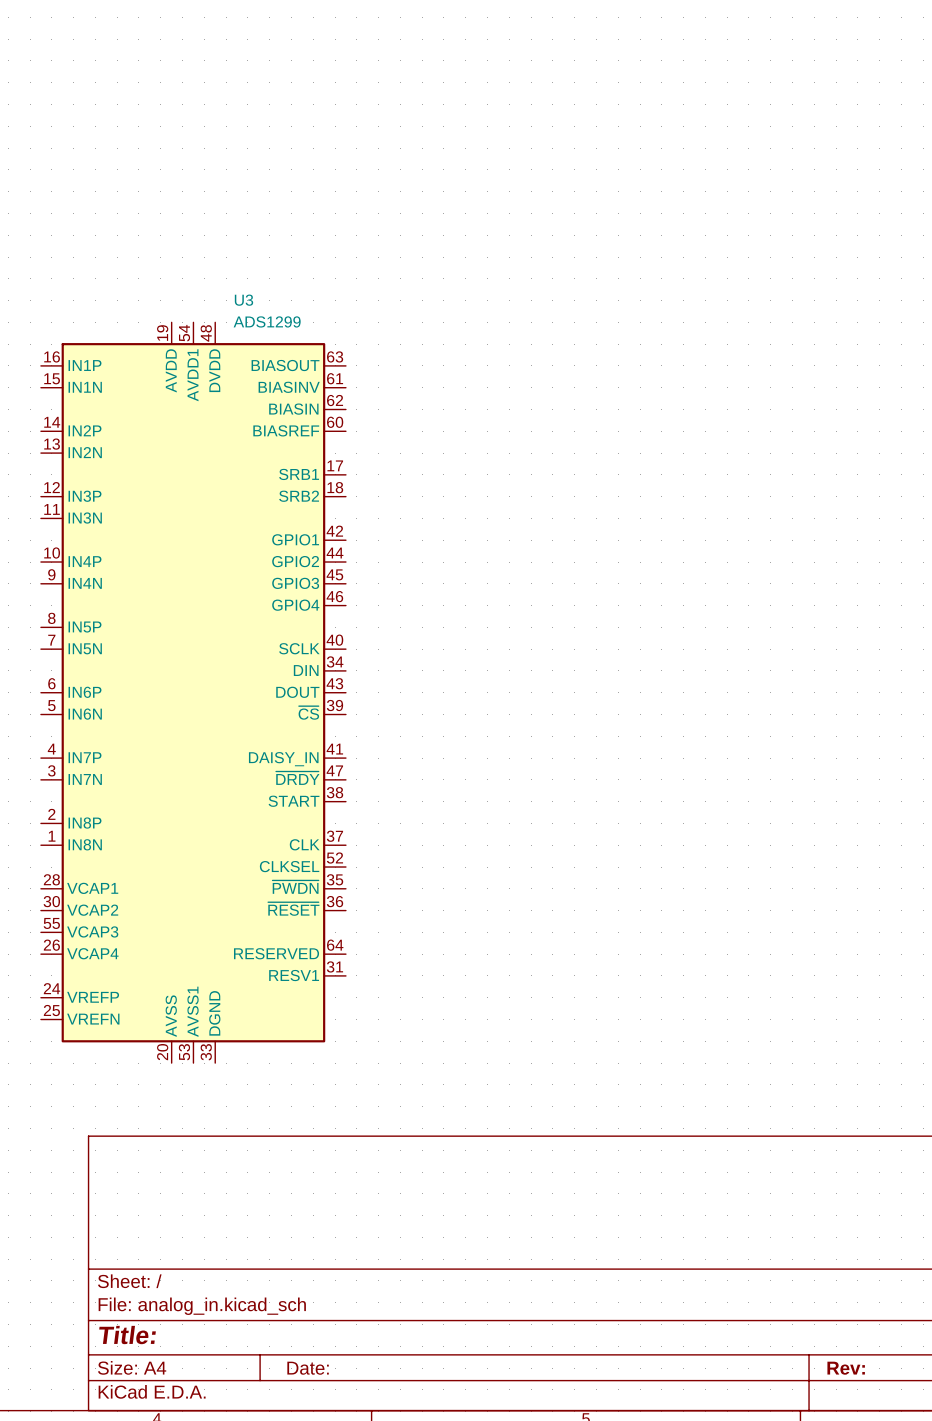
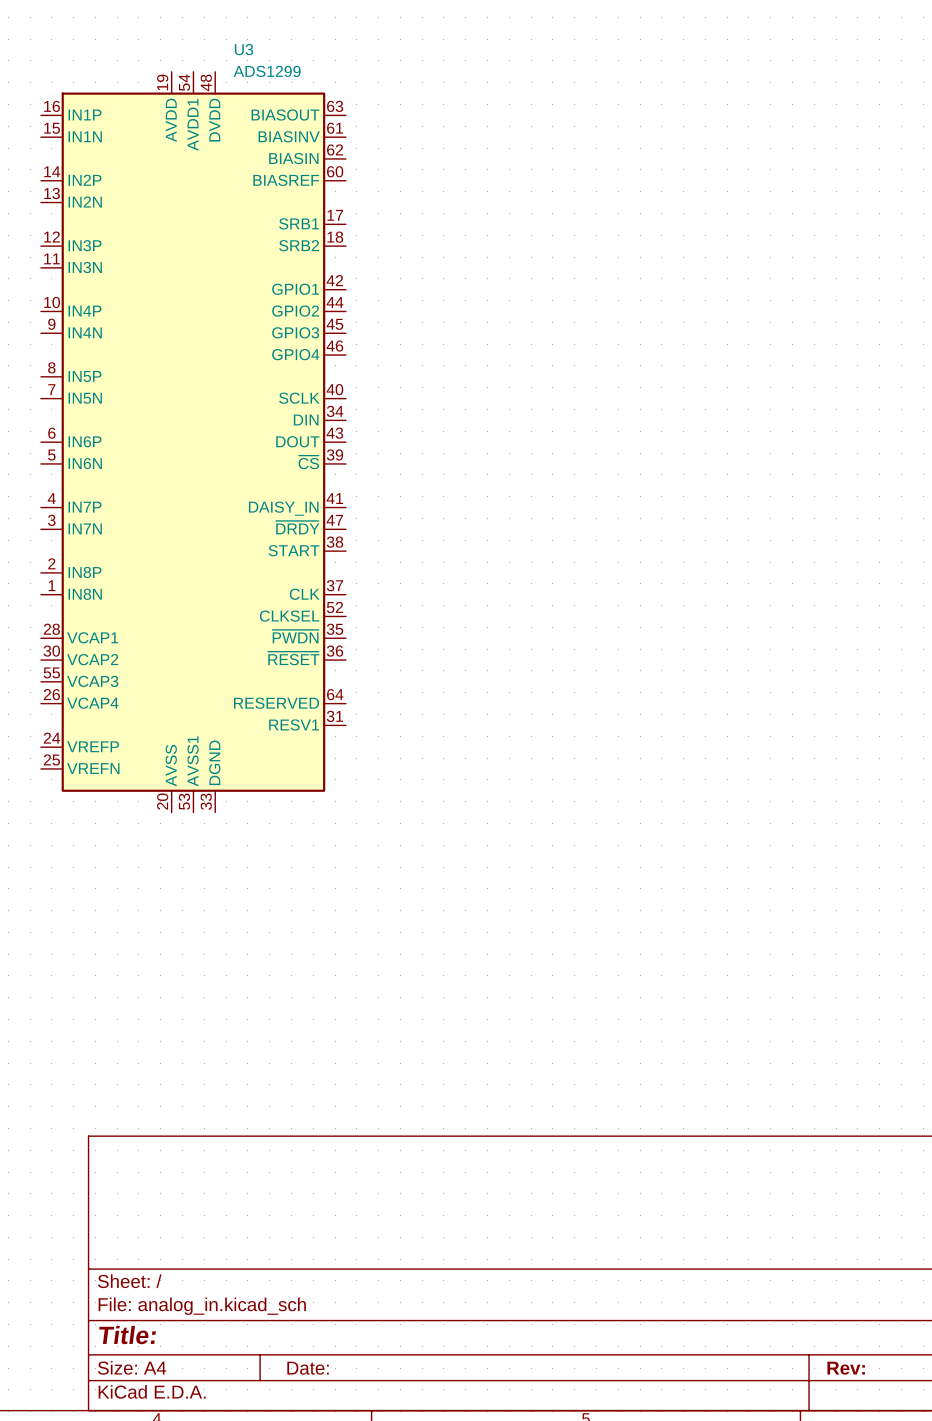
U3 position: (193, 692) -> (193, 442)

